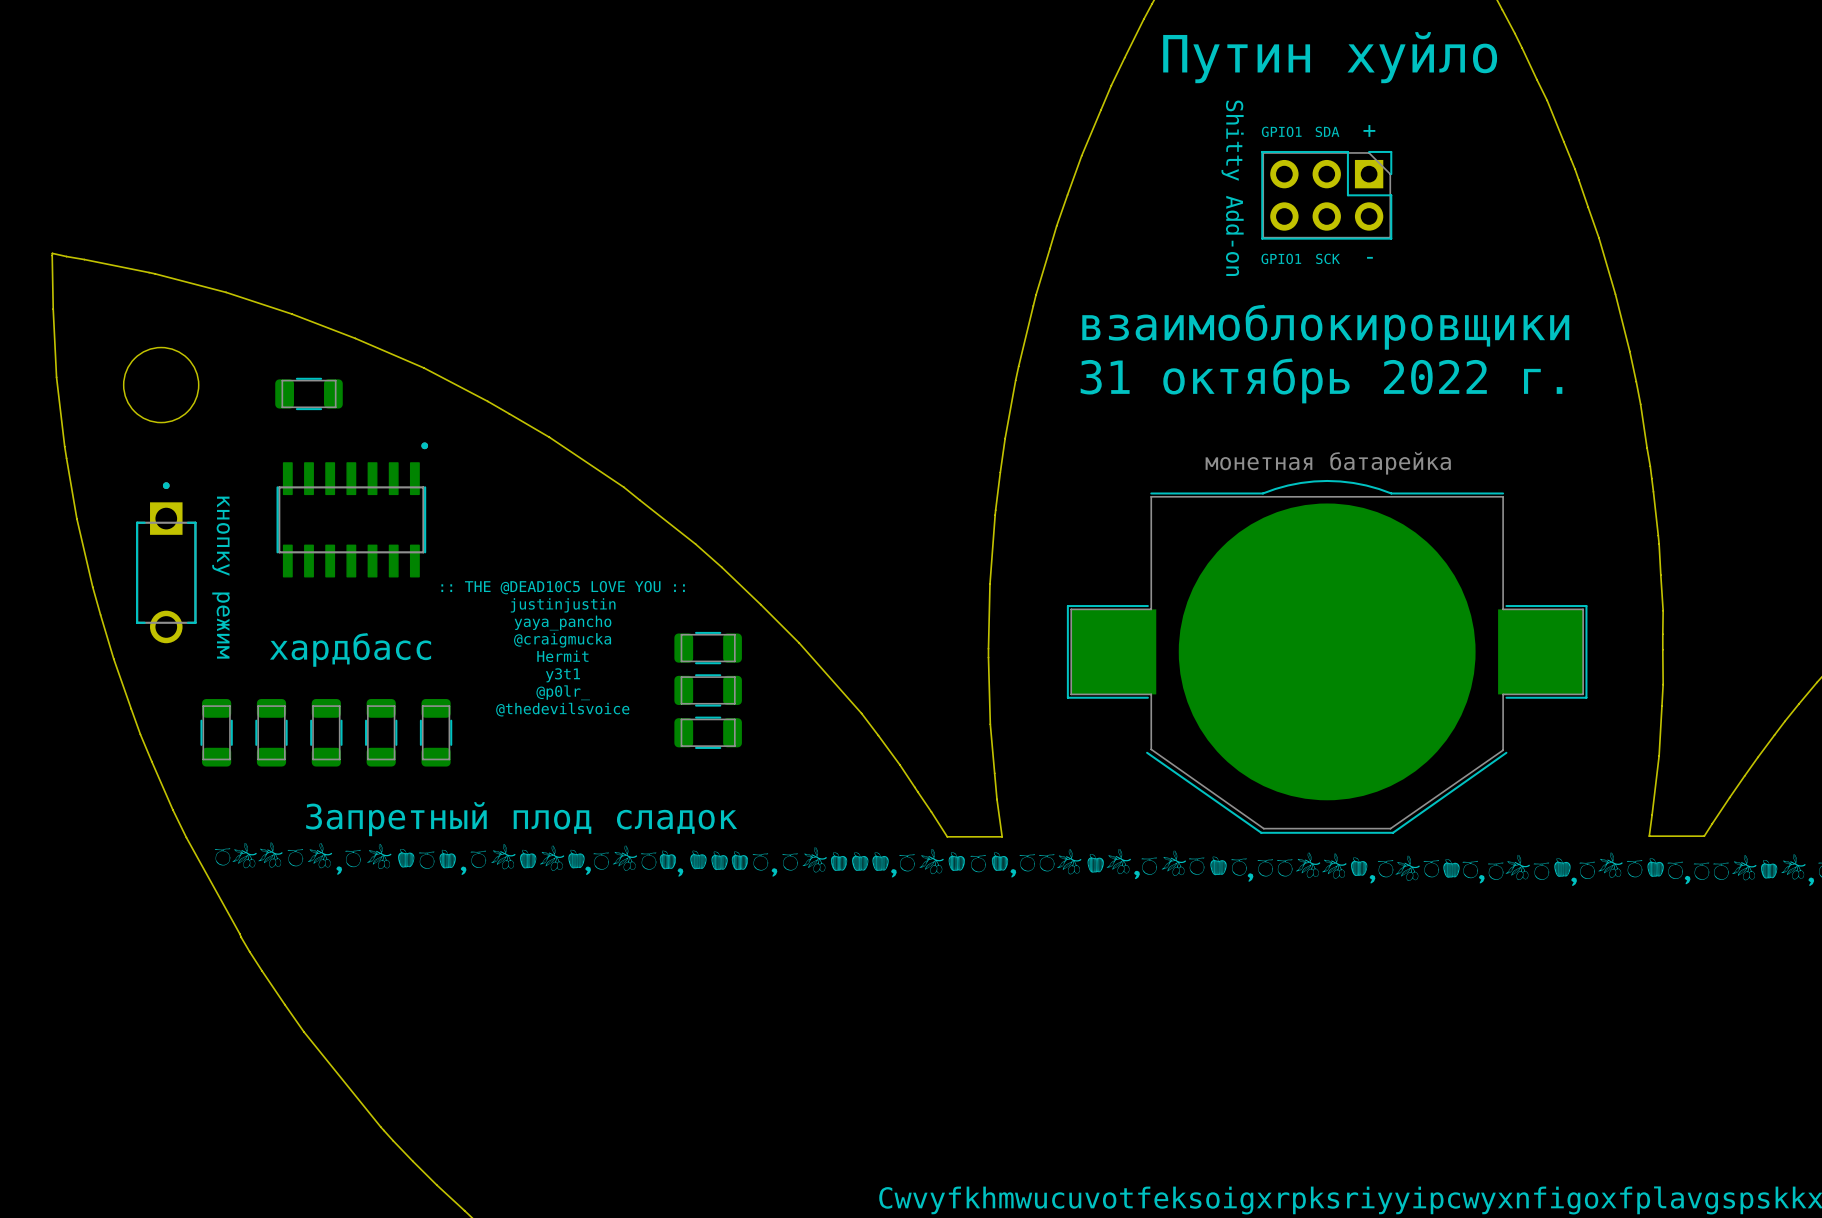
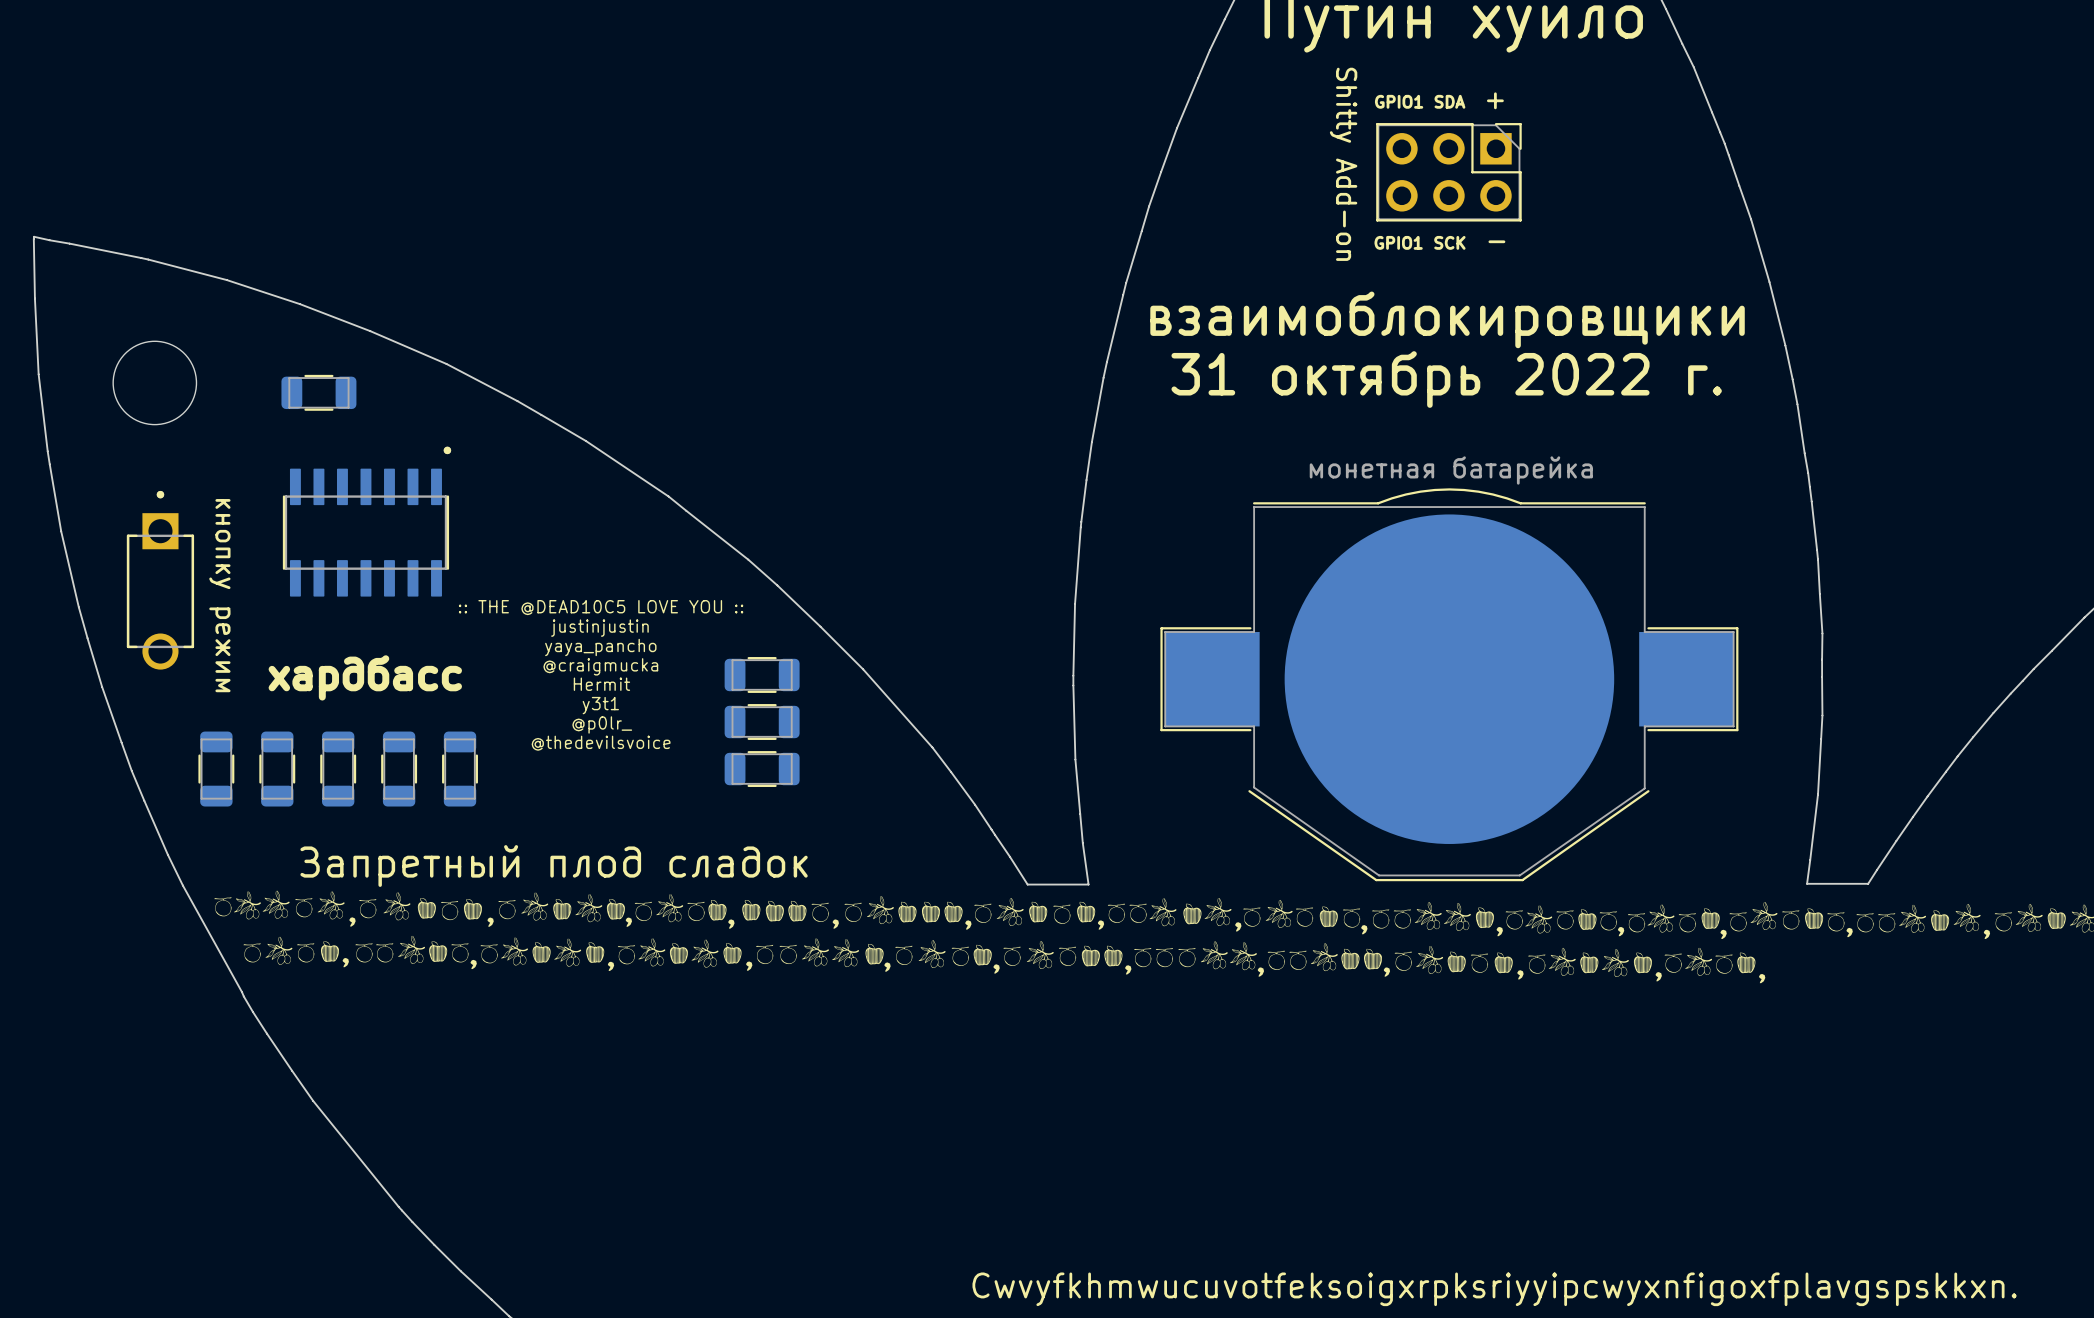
drawing: none -> [243, 935, 1766, 984]

